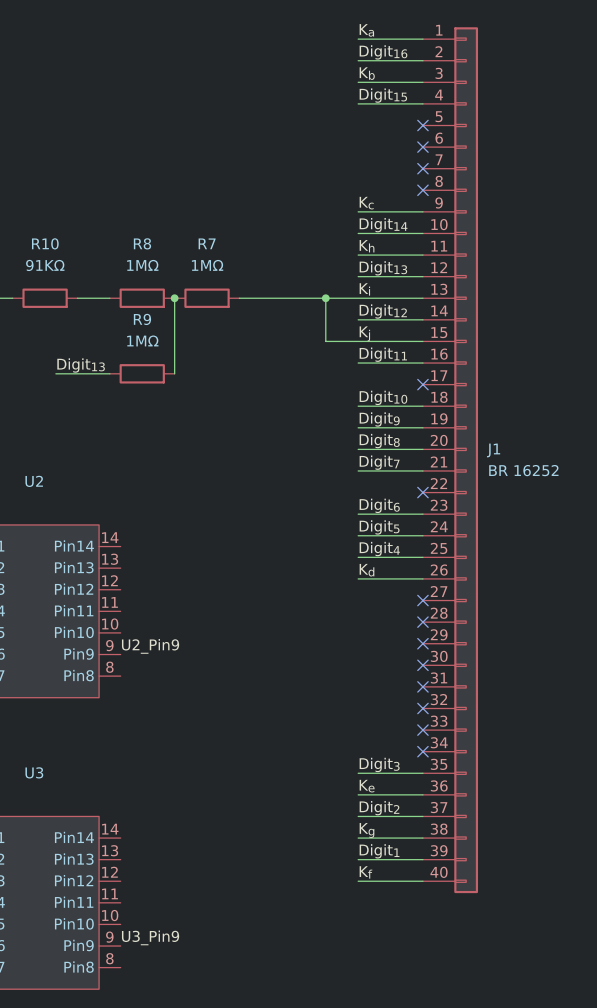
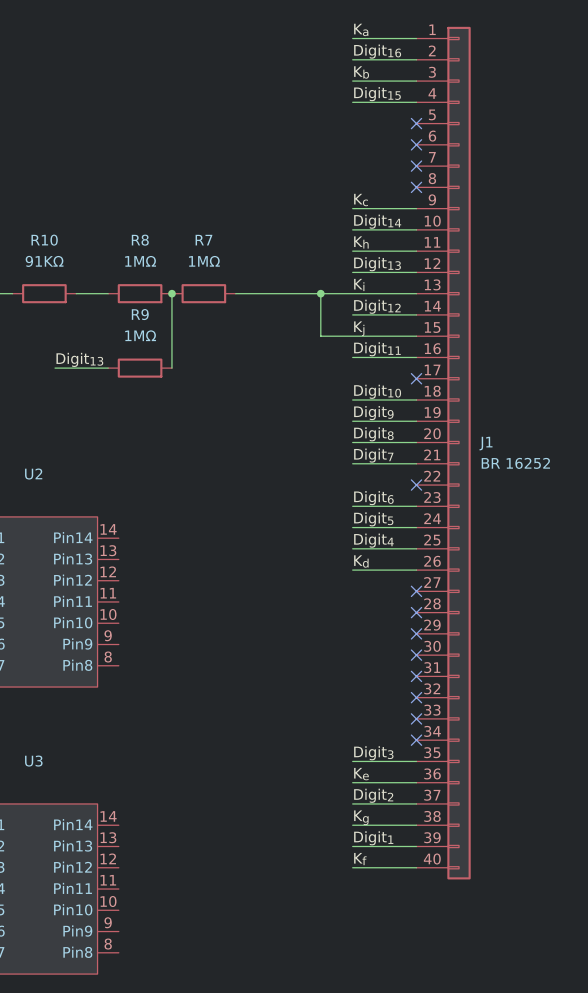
label: U2_Pin9 (150, 646) -> none
label: U3_Pin9 (150, 937) -> none

